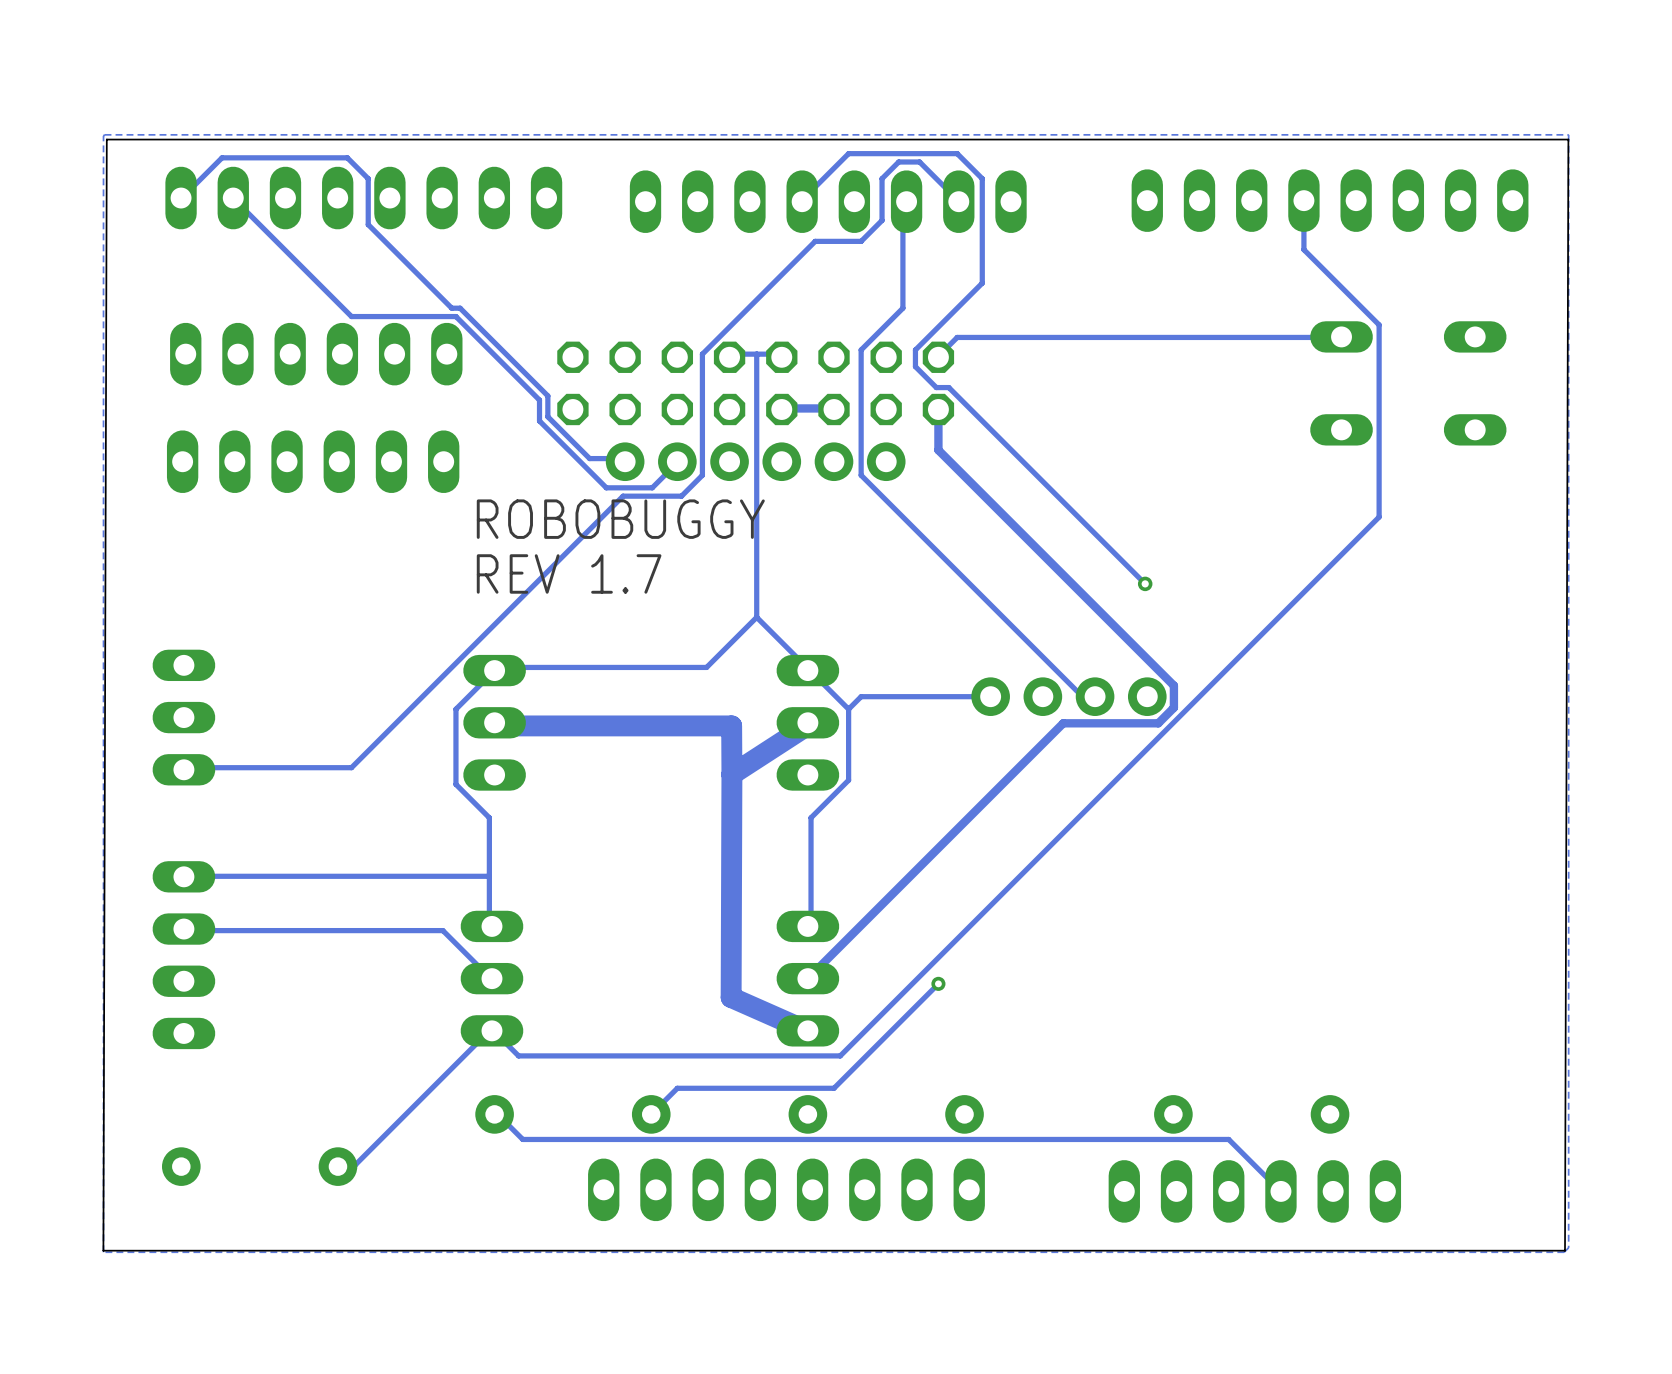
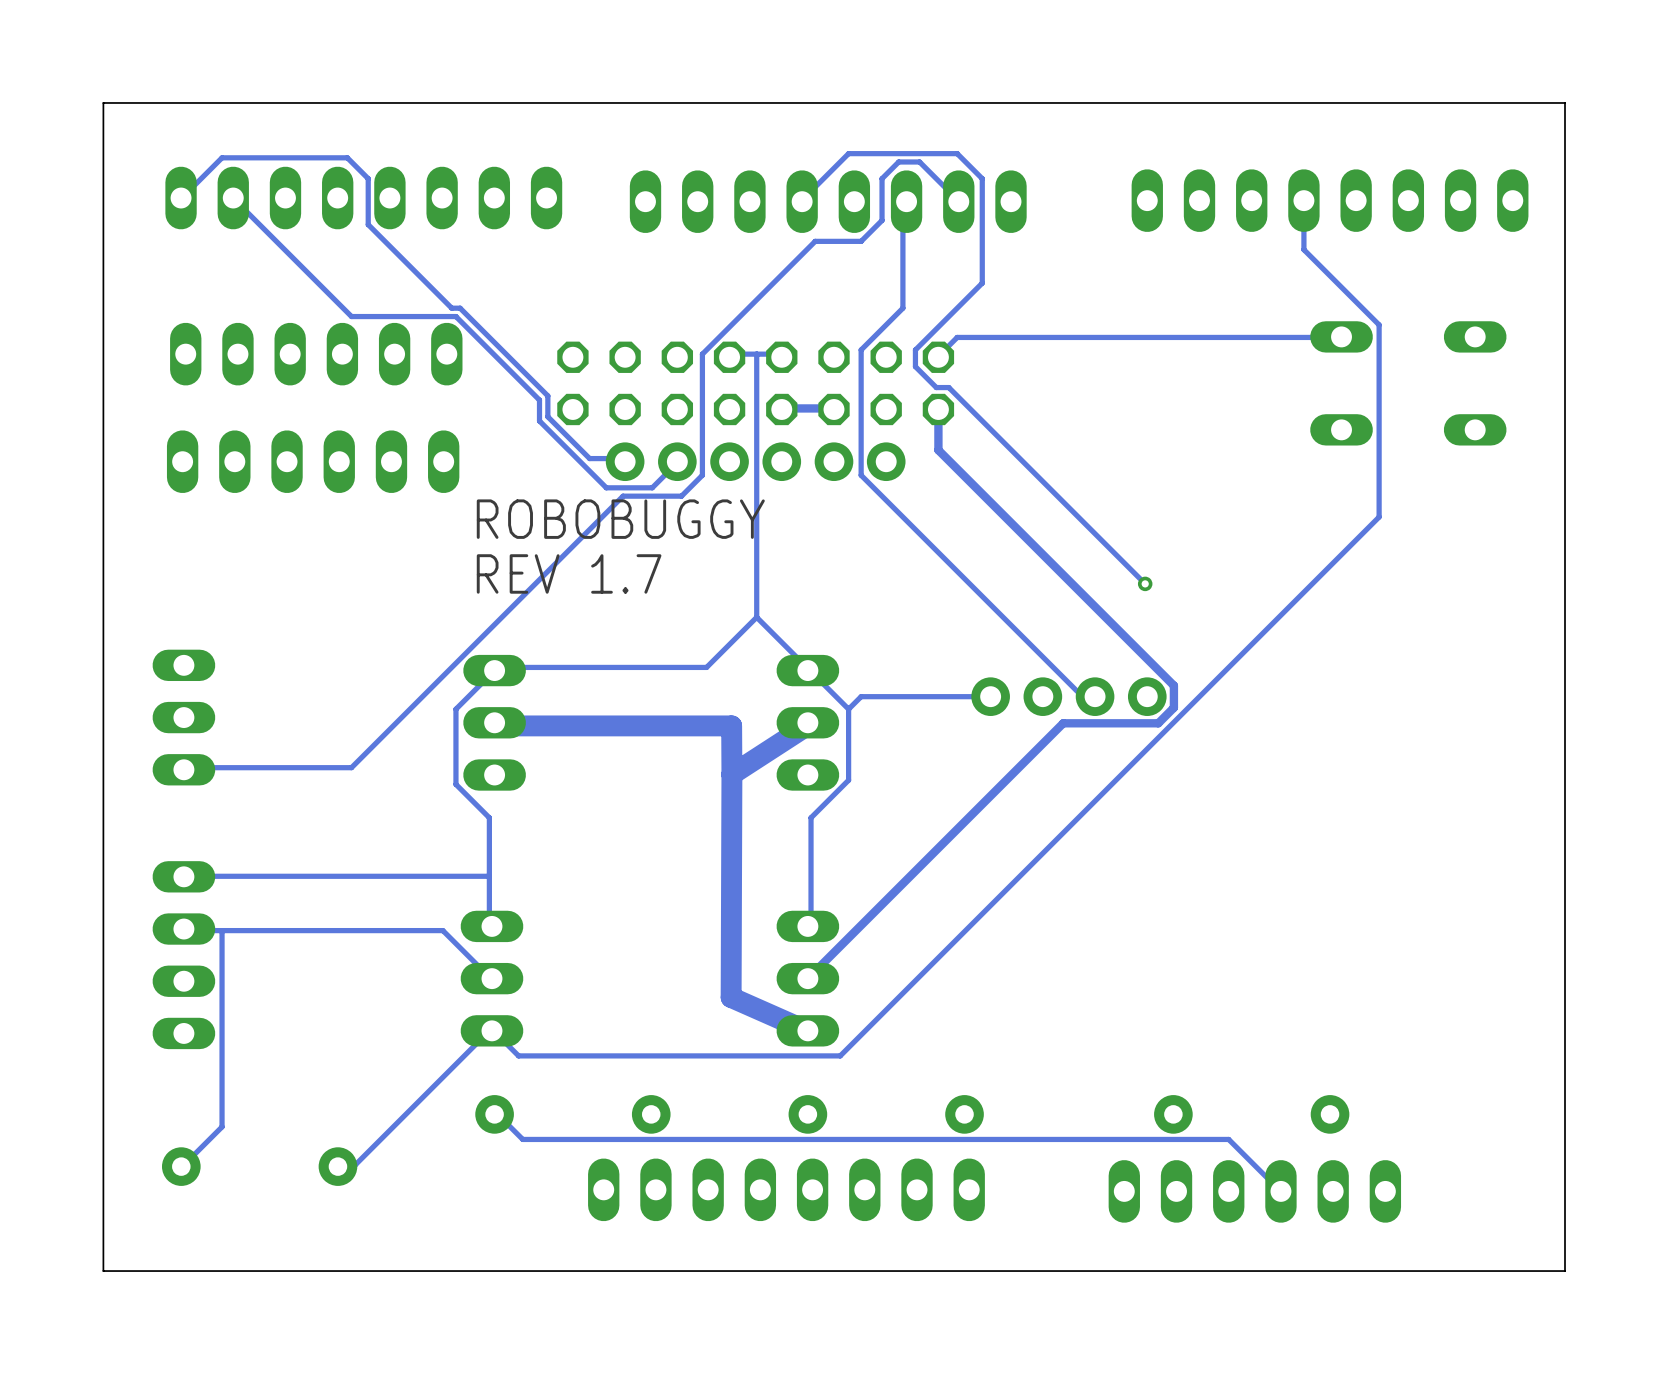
zone outline: (1568, 134) (1568, 1247) (1564, 1252) (103, 1252) (104, 134) (1568, 134) -> none
board edge: (1568, 139) (106, 139) (103, 1250) (1565, 1250) (1568, 139) -> (1565, 102) (1565, 1271) (103, 1271) (103, 102) (1565, 102)
track: none -> (222, 930) (222, 1126) (181, 1166)
track: (938, 983) (833, 1088) (677, 1088) (651, 1114) -> none
via: (938, 983) -> none

